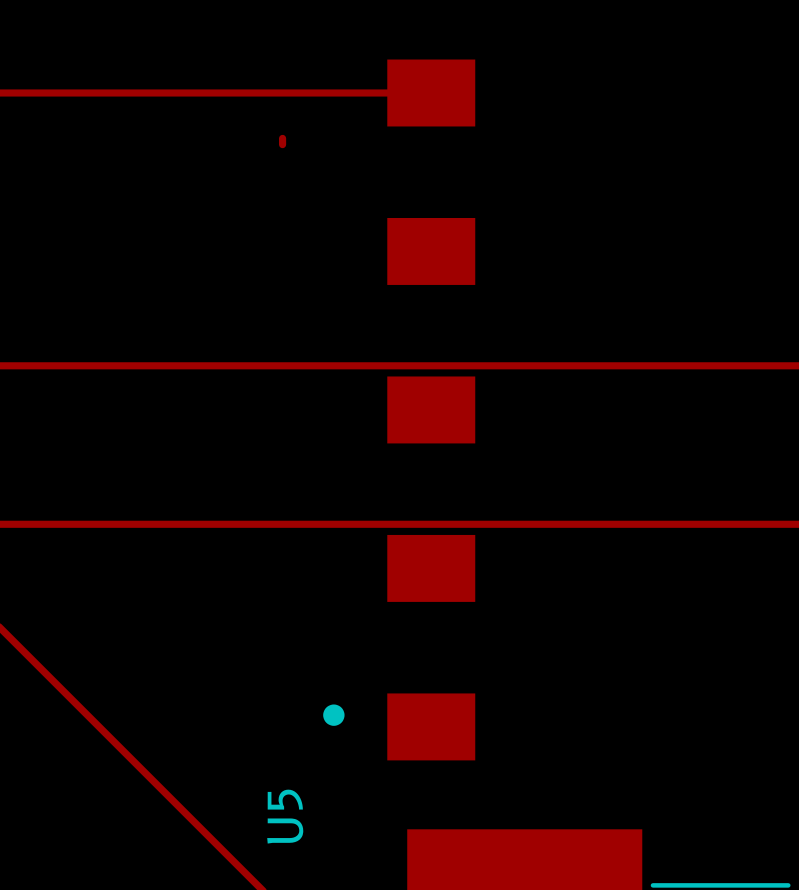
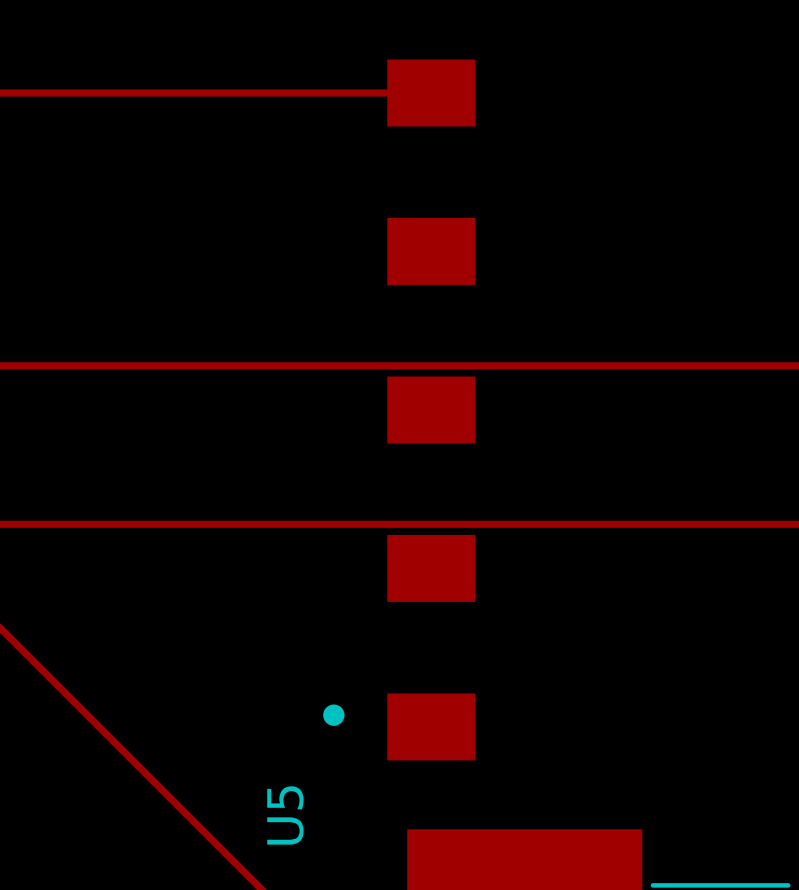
top track: (282, 138) (282, 144) -> none

